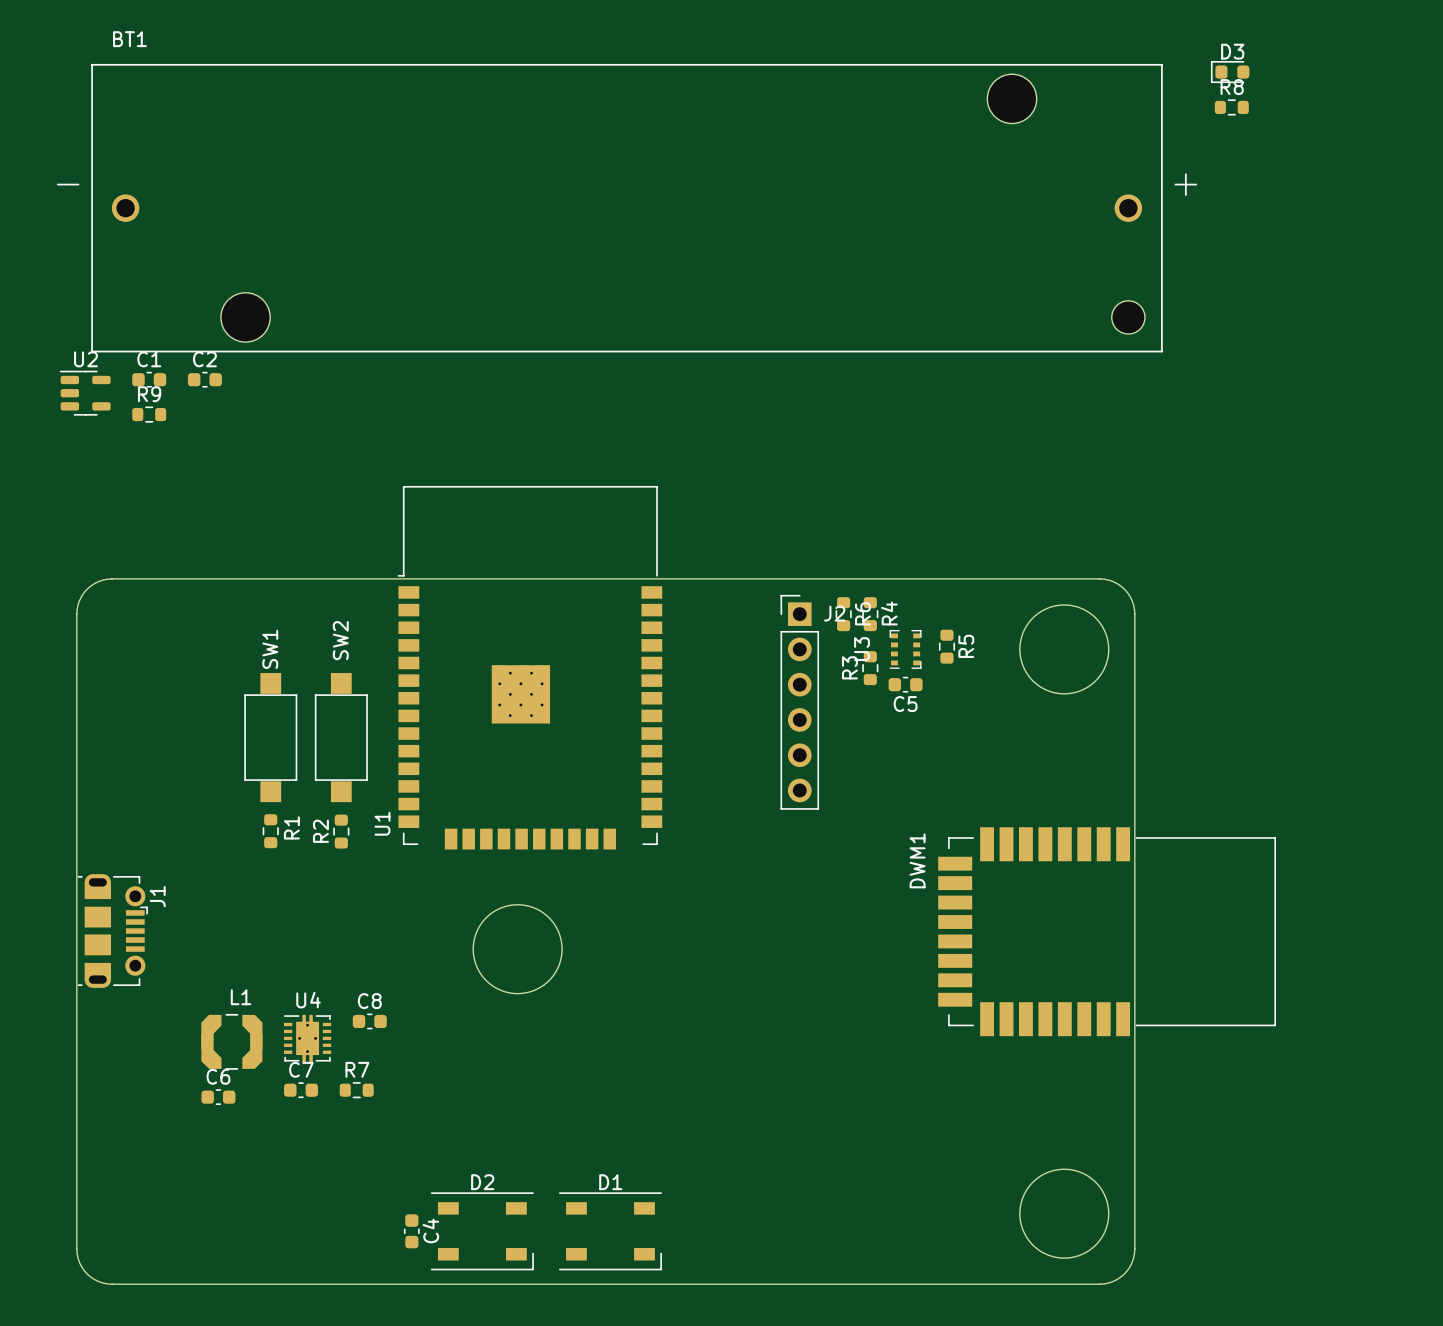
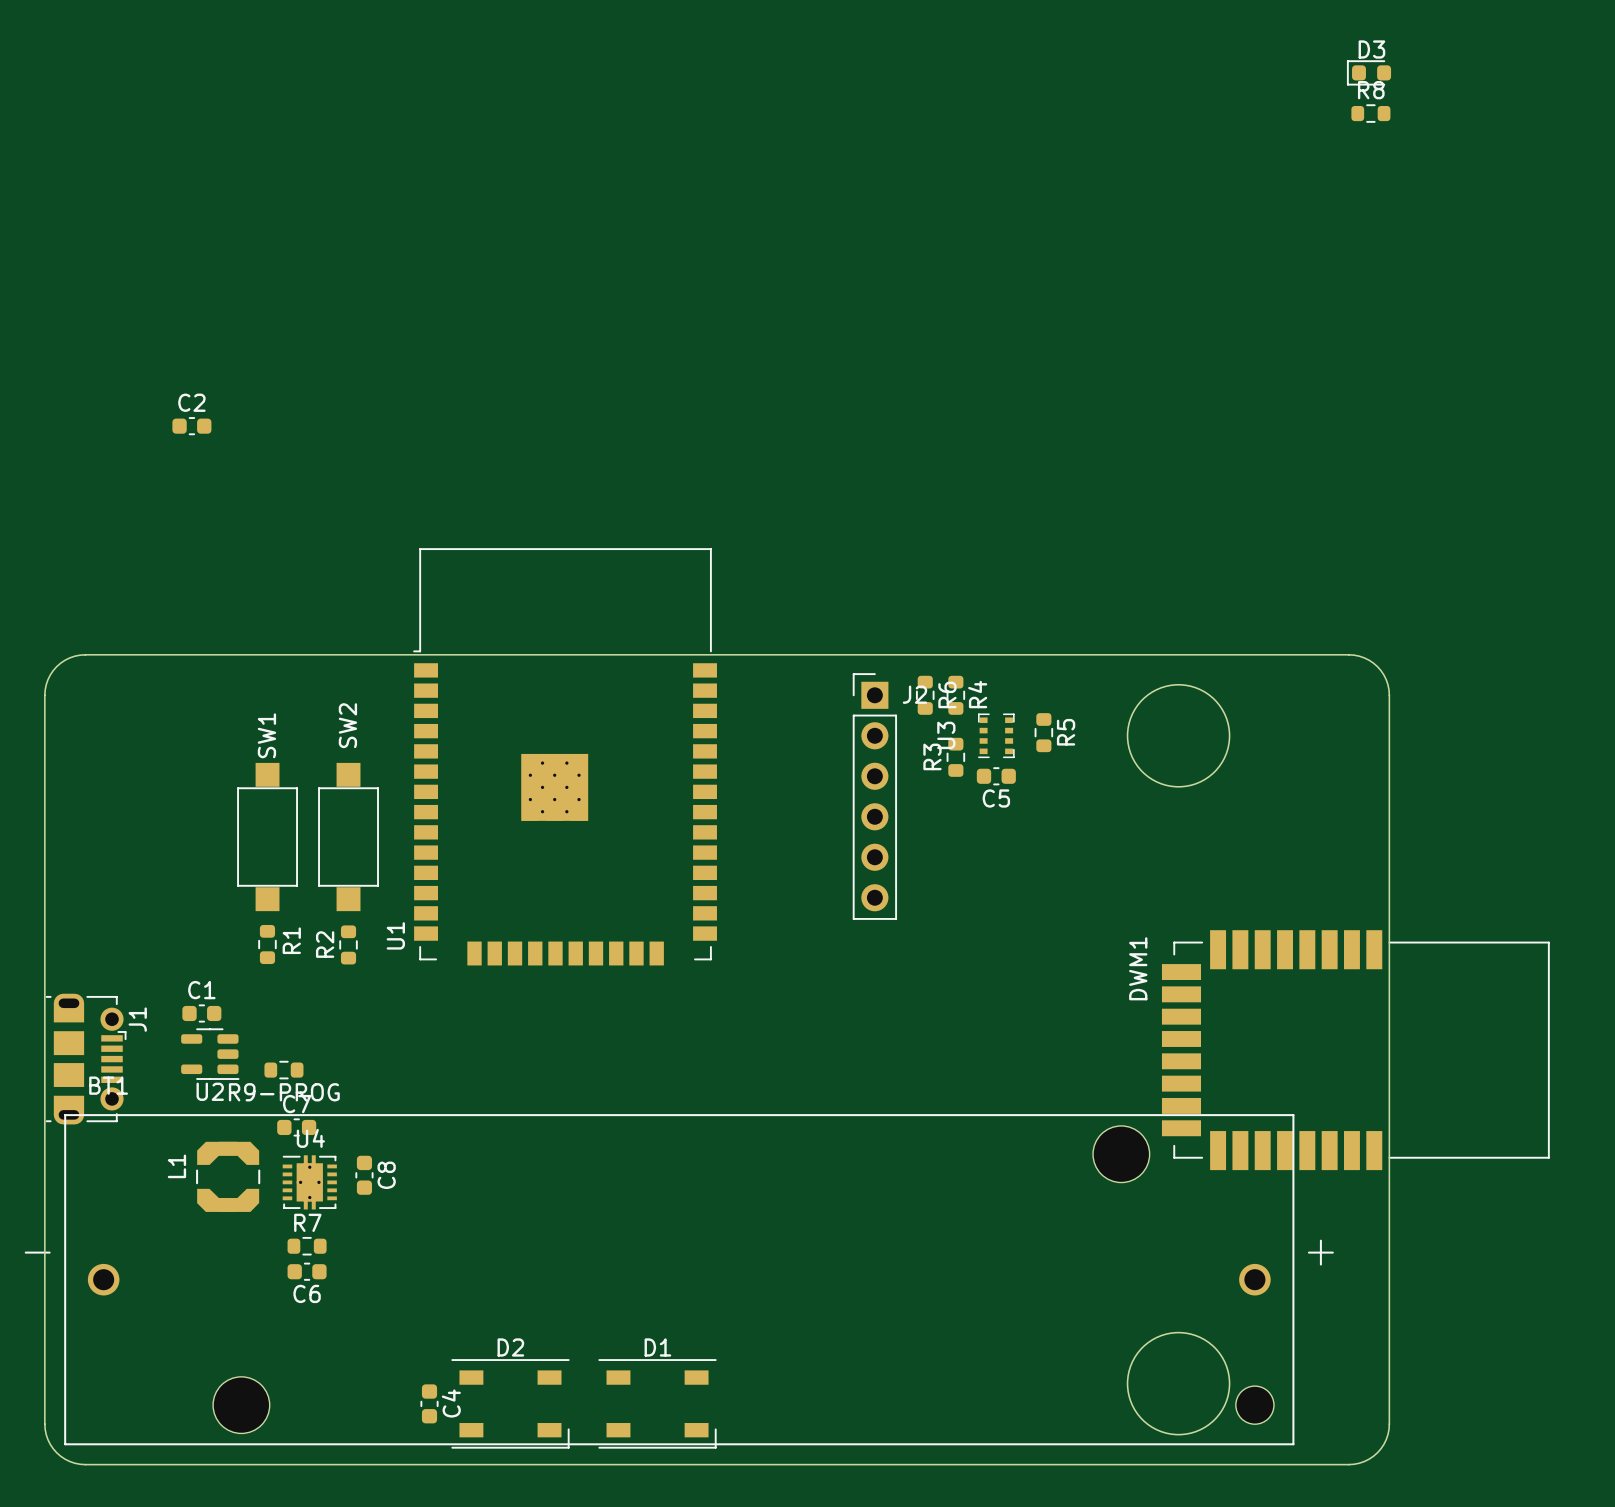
BT1 position: (626, 208) -> (679, 1279)
C1 position: (149, 379) -> (201, 1013)
U2 rotation: 0° (85, 393) -> 180° (210, 1054)
U2 position: (85, 393) -> (210, 1054)
R9: (149, 414) -> none
board edge: (1099, 578) (1113, 581) (1124, 589) (1132, 600) (1134, 614) (1134, 1248) (1132, 1262) (1124, 1273) (1113, 1281) (1099, 1284) -> (1219, 654) (1359, 656) (1373, 663) (1380, 670) (1386, 679) (1389, 695) (1387, 1434) (1380, 1448) (1373, 1456) (1354, 1464) (1219, 1464)
round board edge: [472, 904, 563, 995] -> none
DWM1 position: (1107, 931) -> (1355, 1050)
R9-PROG: none -> (283, 1070)
L1 name position: L1 (241, 997) -> L1 (176, 1166)
C8 rotation: 0° (369, 1021) -> 90° clockwise (364, 1175)
L1 rotation: 0° (231, 1041) -> 90° clockwise (228, 1176)
C6 name position: C6 (218, 1076) -> C6 (307, 1293)
C7 position: (301, 1090) -> (296, 1127)
R7 position: (356, 1090) -> (307, 1246)
C6 position: (218, 1097) -> (307, 1271)

